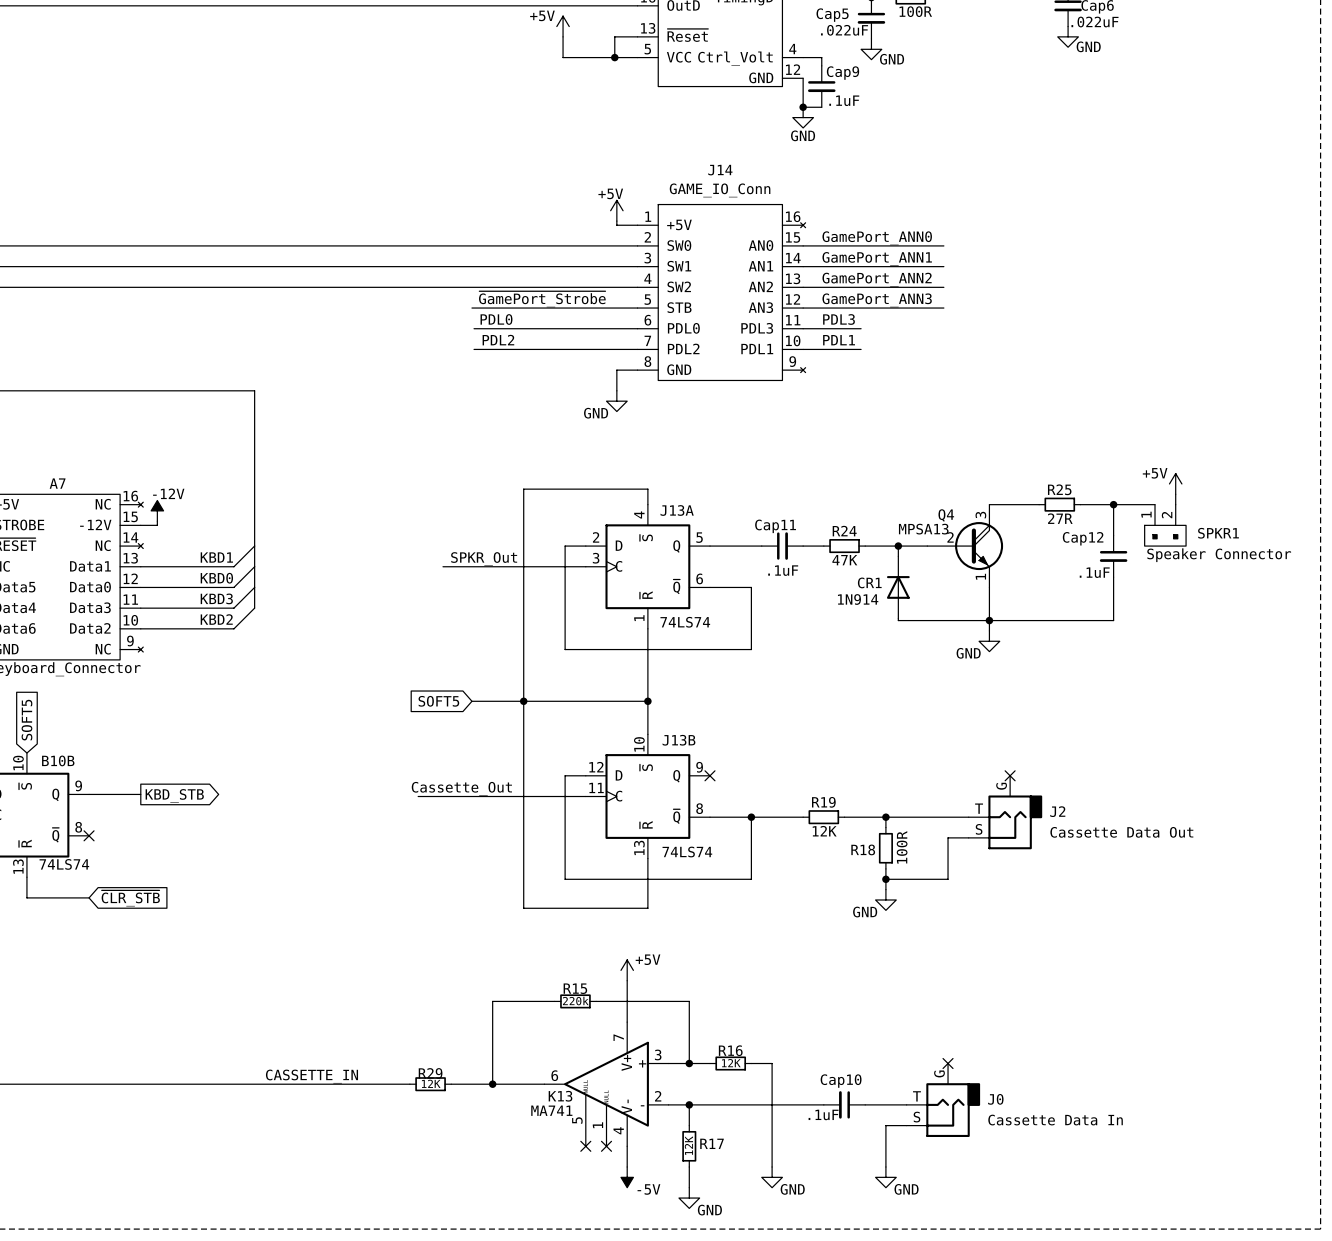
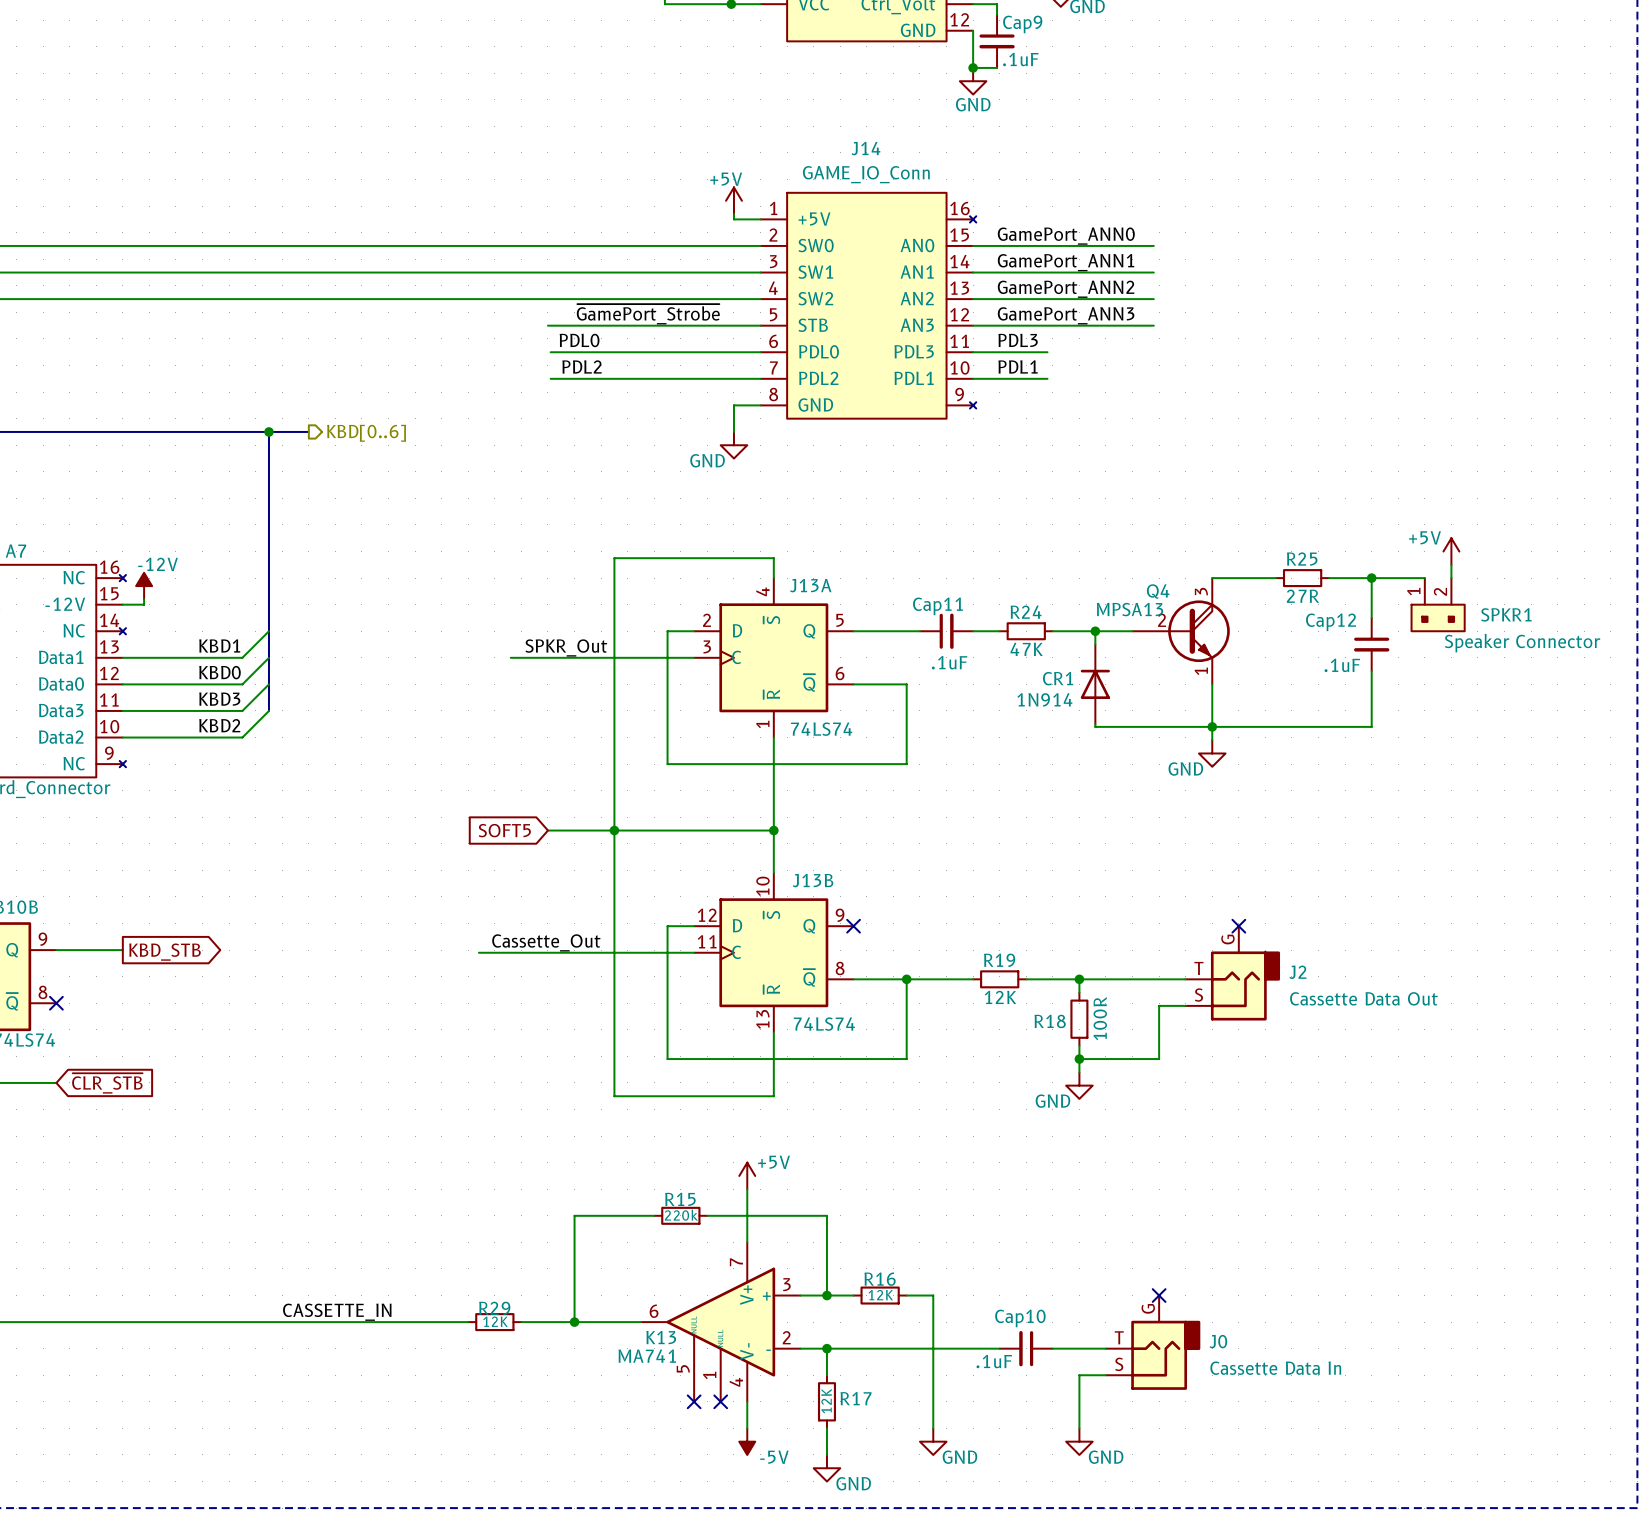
bus: none -> (268, 431) (308, 431)
junction: none -> (268, 431)
hierarchical label: none -> KBD[0..6] (366, 433)

